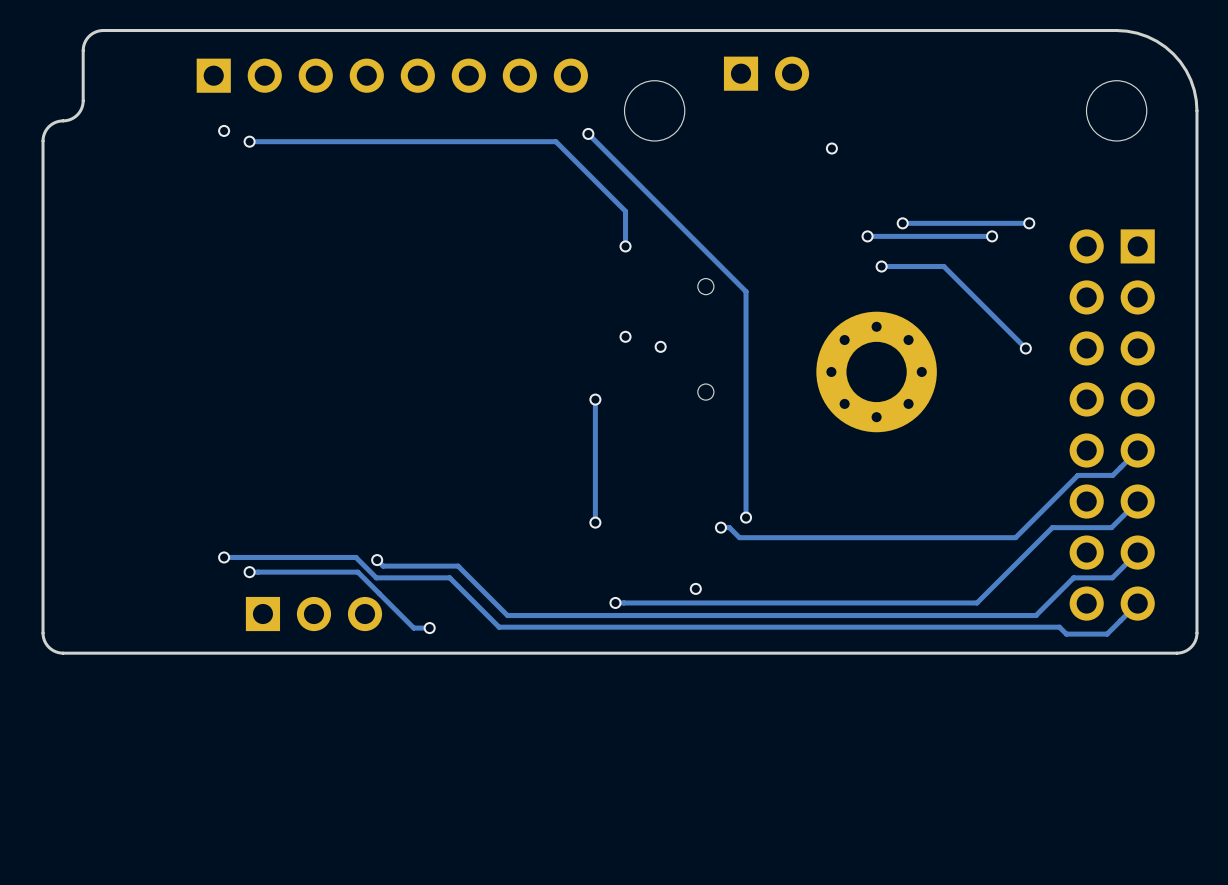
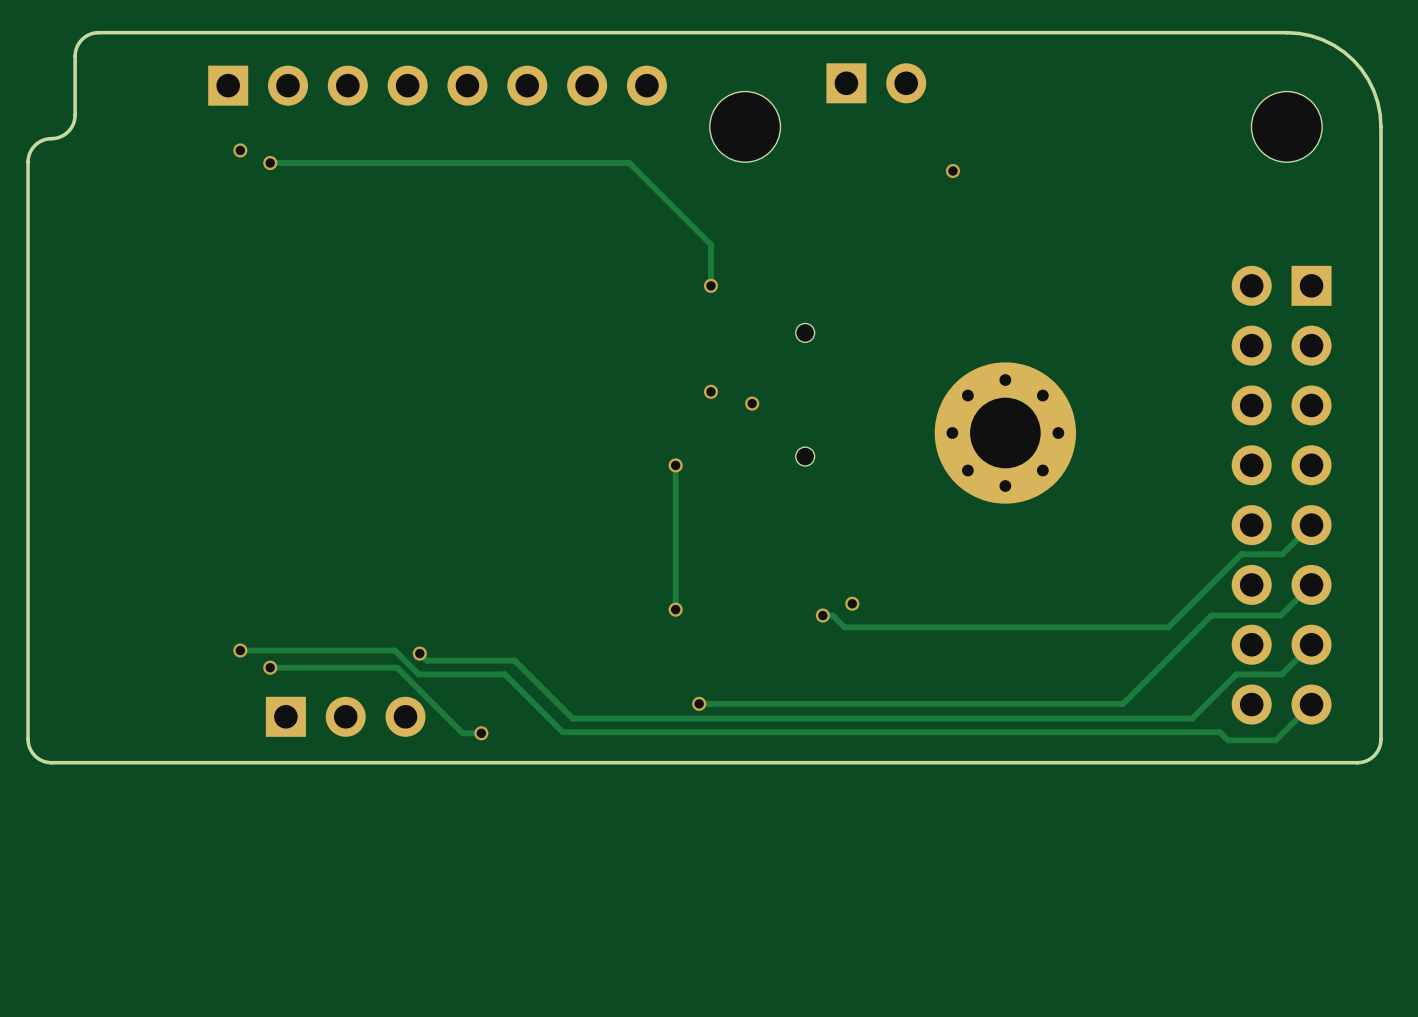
track: (588, 133) (746, 291) (746, 517) -> none
via: (588, 133) -> none
via: (902, 223) -> none
track: (1029, 223) (902, 223) -> none
via: (1029, 223) -> none
via: (867, 236) -> none
track: (992, 236) (867, 236) -> none
via: (992, 236) -> none
track: (881, 266) (943, 266) (1025, 348) -> none
via: (881, 266) -> none
via: (1025, 348) -> none
via: (695, 588) -> none

